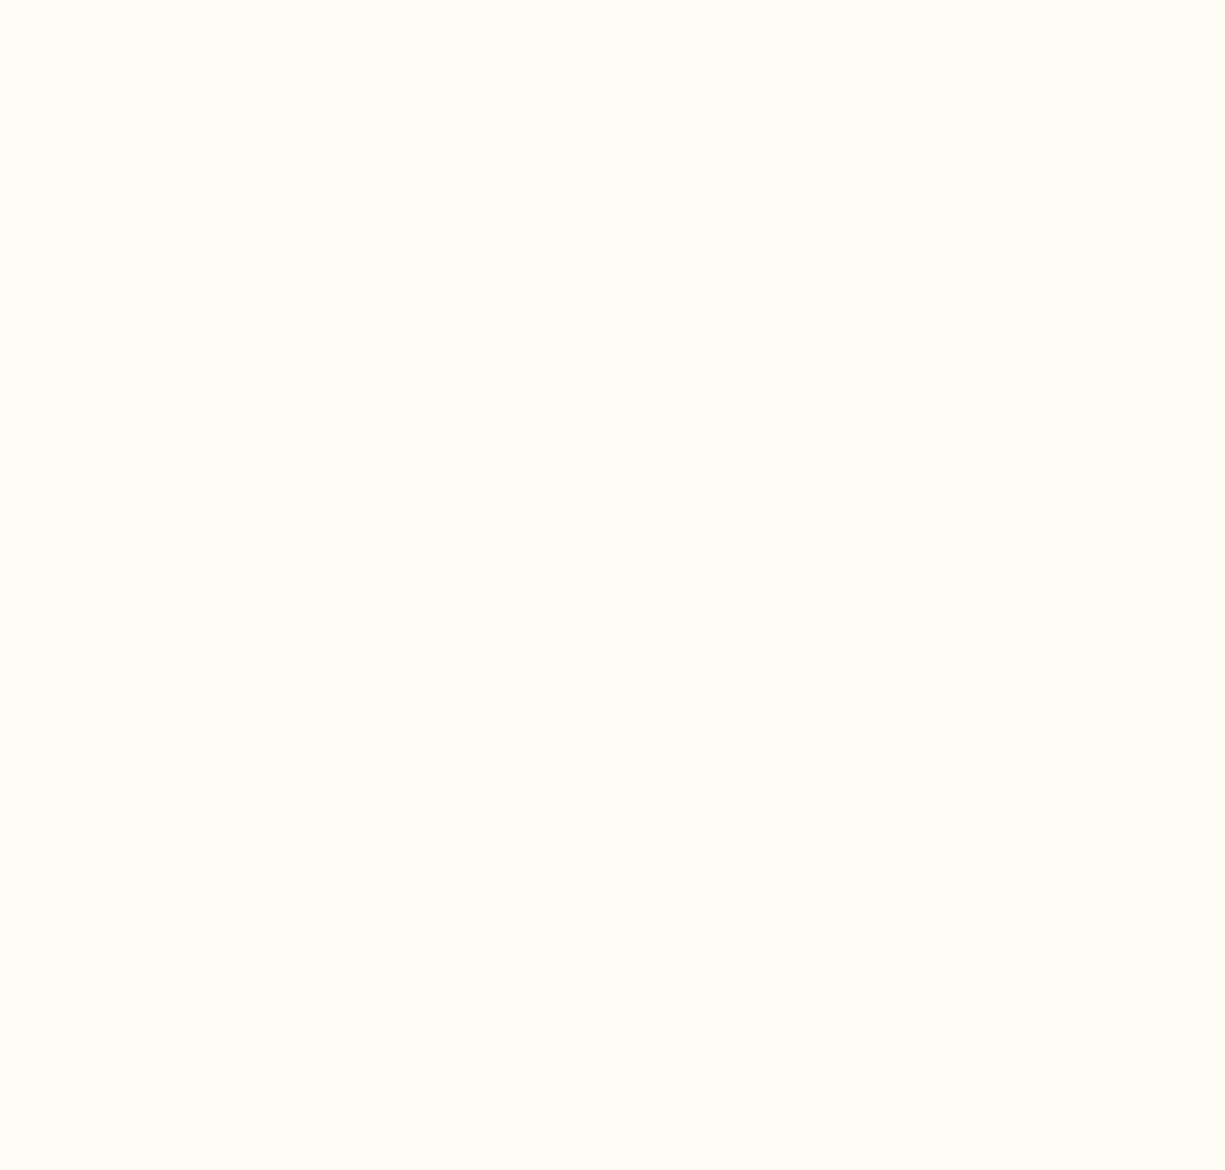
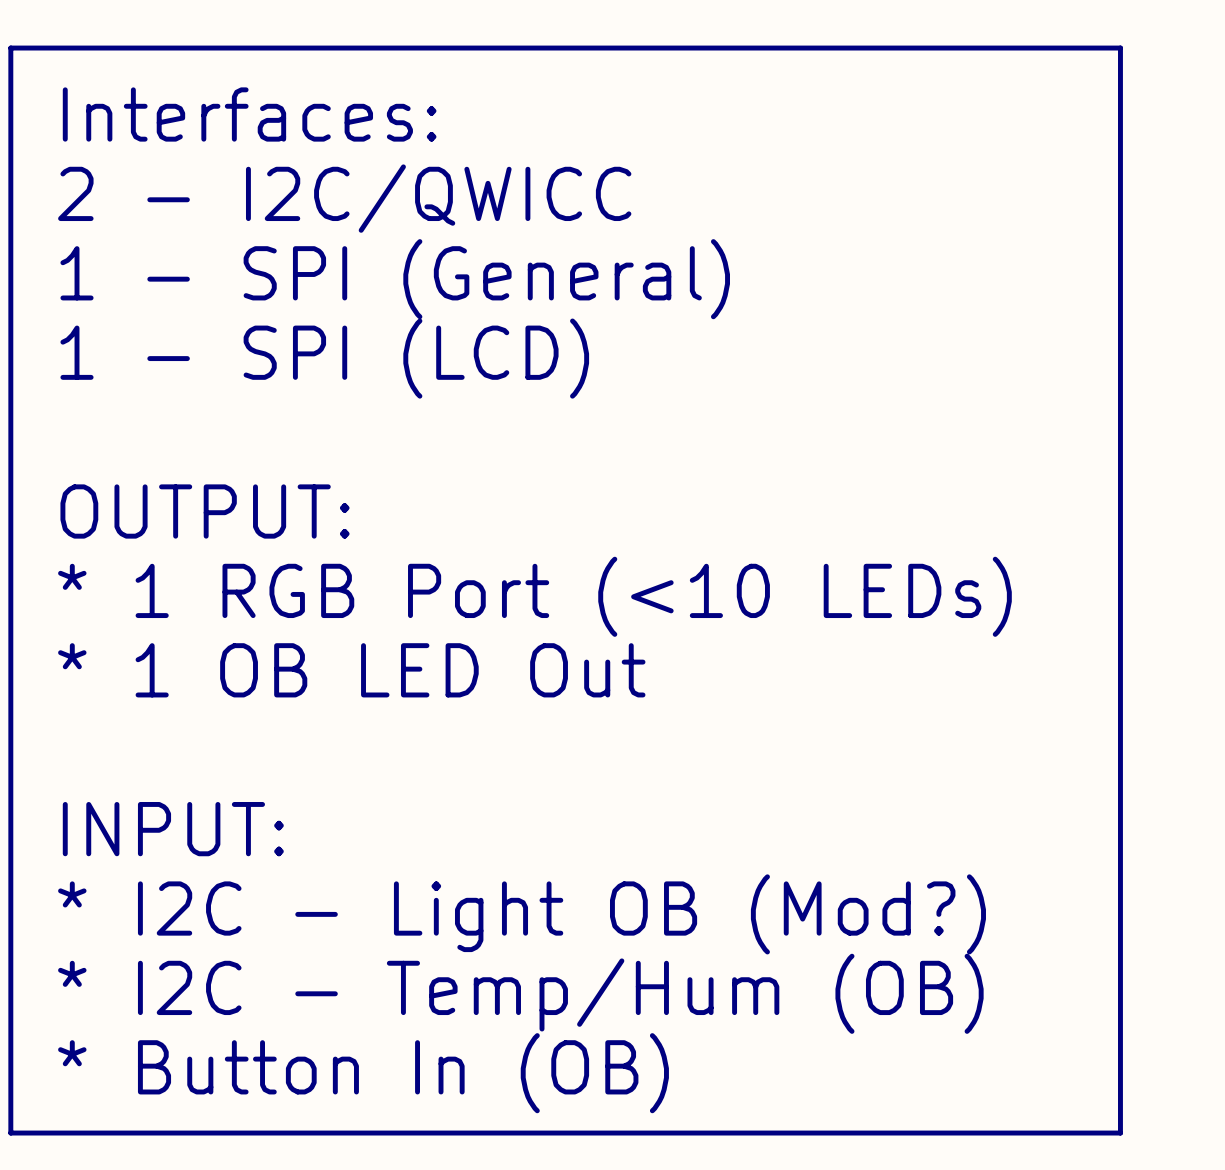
line: none -> (10, 48) (1120, 48) (1120, 1133) (10, 1133) (10, 48)
text: none -> Interfaces: (249, 114)
text: none -> 2 - I2C/QWICC (344, 198)
text: none -> 1 - SPI (General) (395, 279)
text: none -> 1 - SPI (LCD) (324, 358)
text: none -> OUTPUT: (204, 511)
text: none -> * 1 RGB Port (<10 LEDs) (534, 596)
text: none -> * 1 OB LED Out (351, 670)
text: none -> INPUT: (173, 829)
text: none -> * I2C - Light OB (Mod?) (522, 914)
text: none -> * I2C - Temp/Hum (OB) (520, 993)
text: none -> * Button In (OB) (363, 1073)

